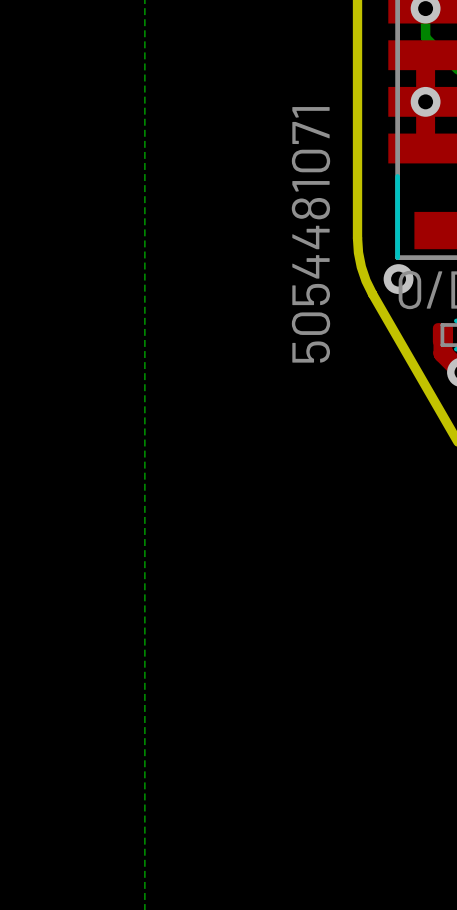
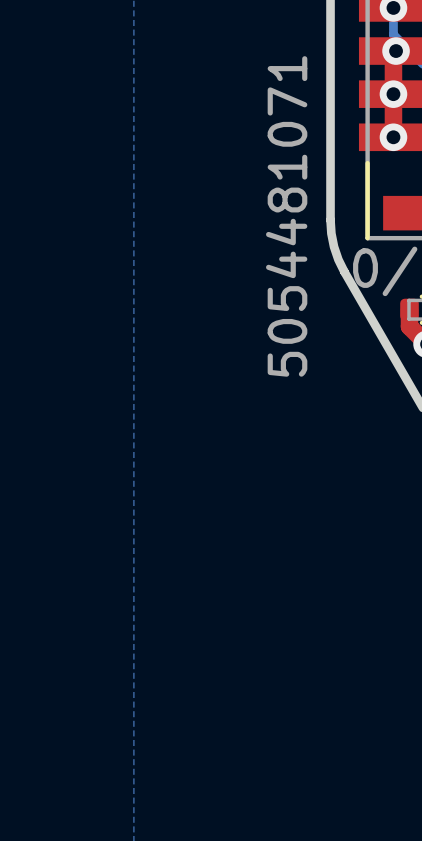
via: none -> (396, 51)
via: none -> (393, 137)
via: (398, 279) -> none

